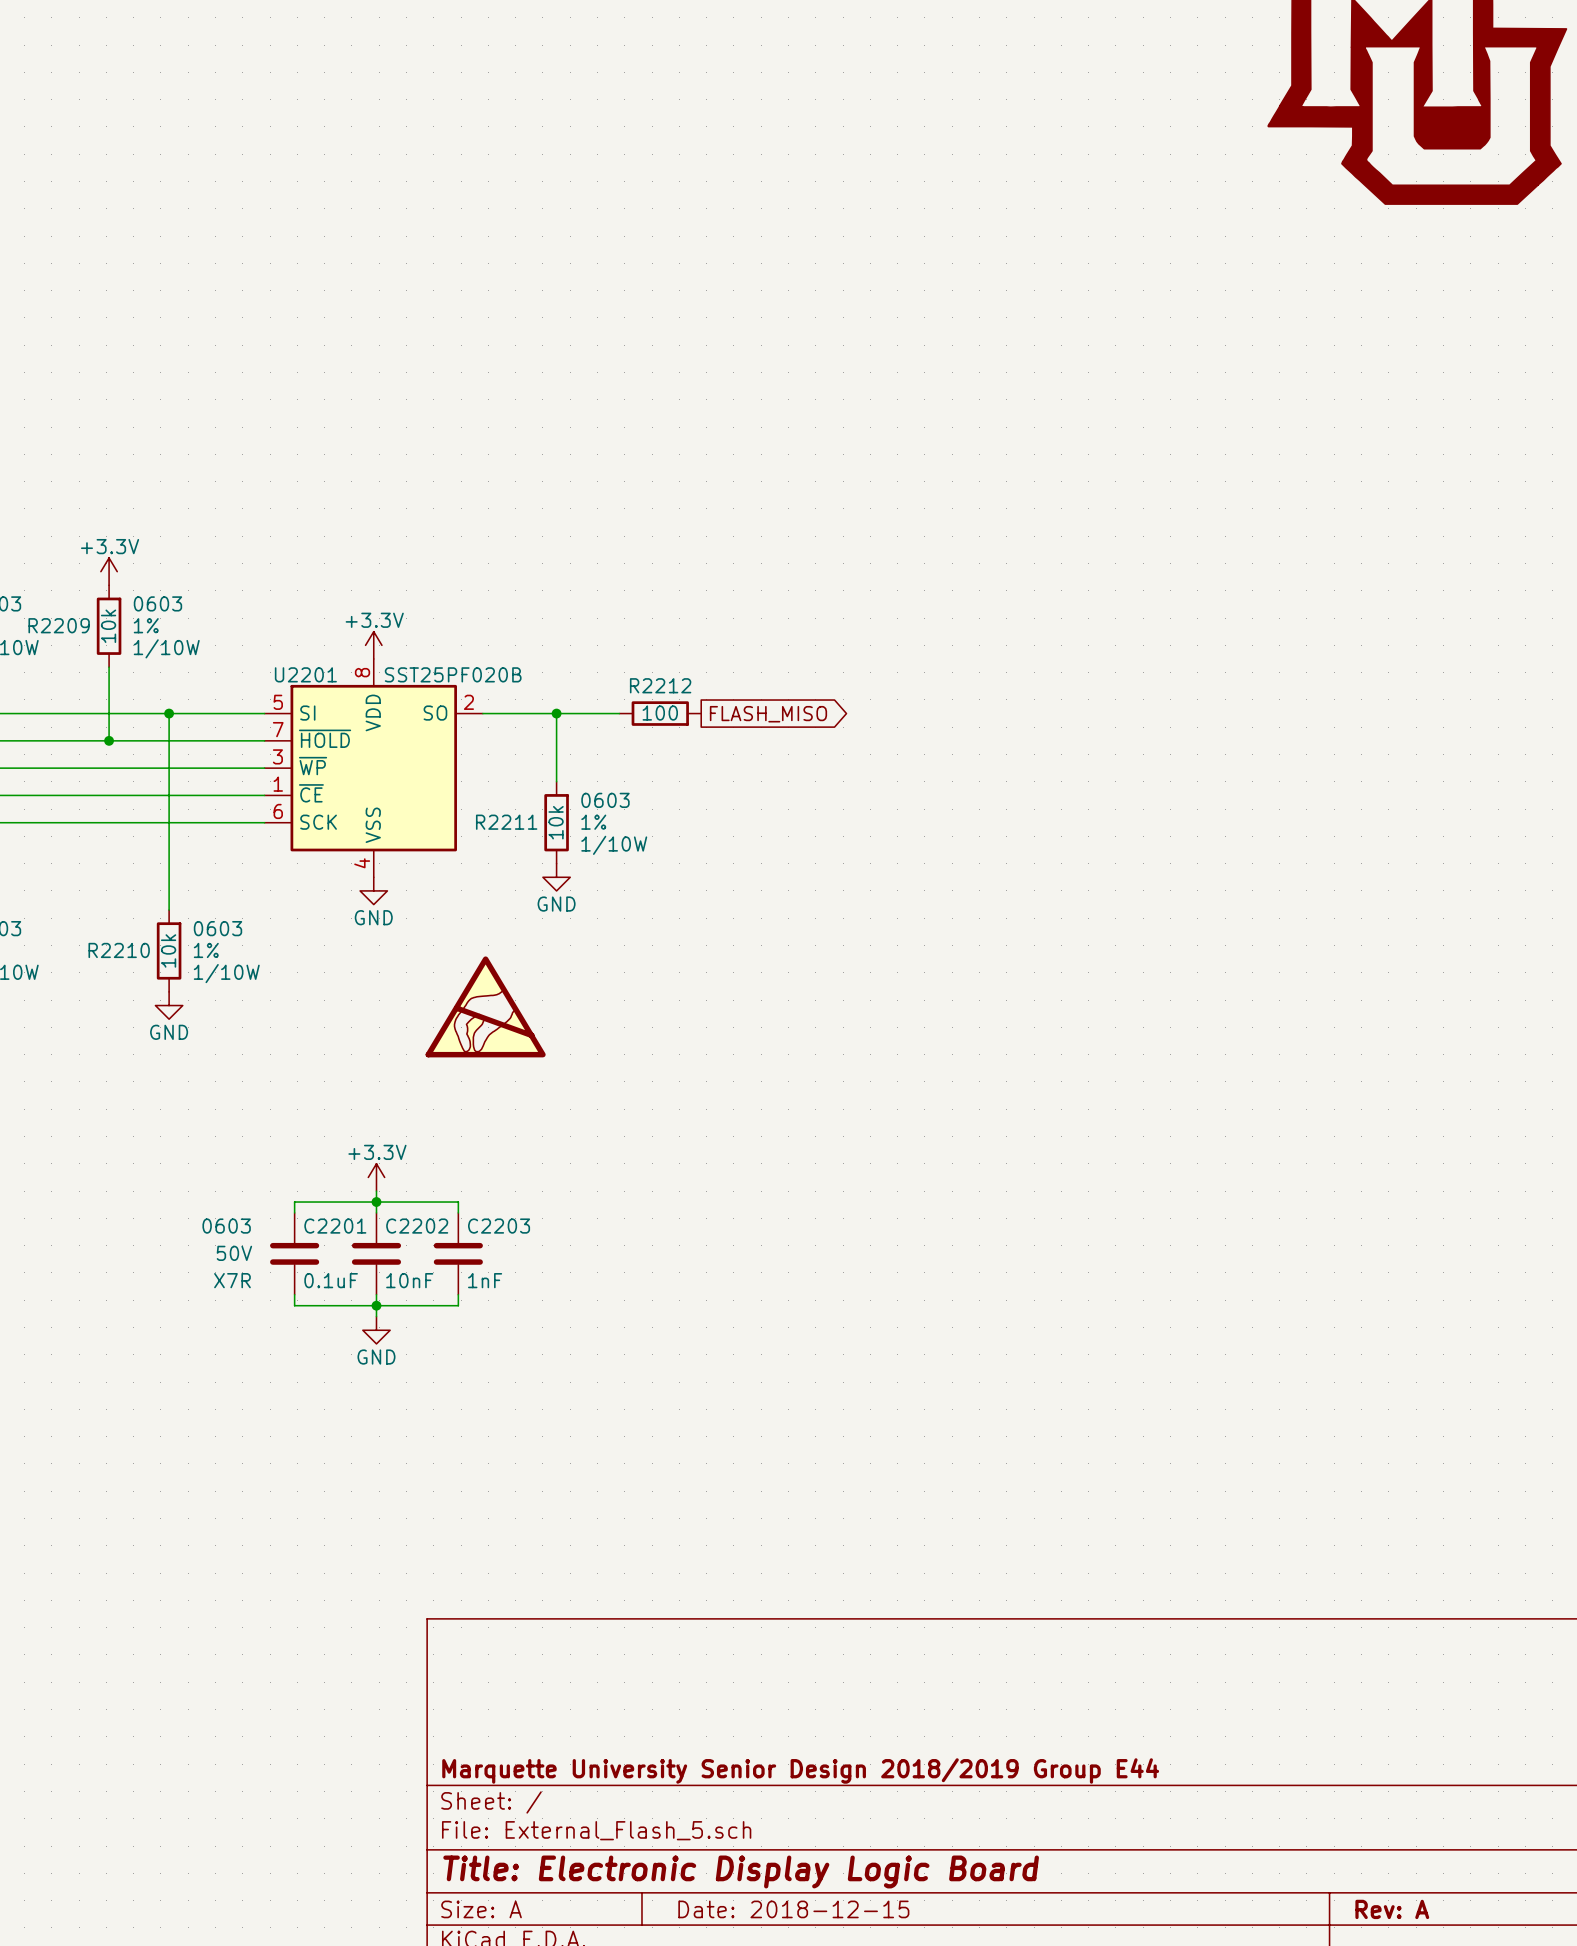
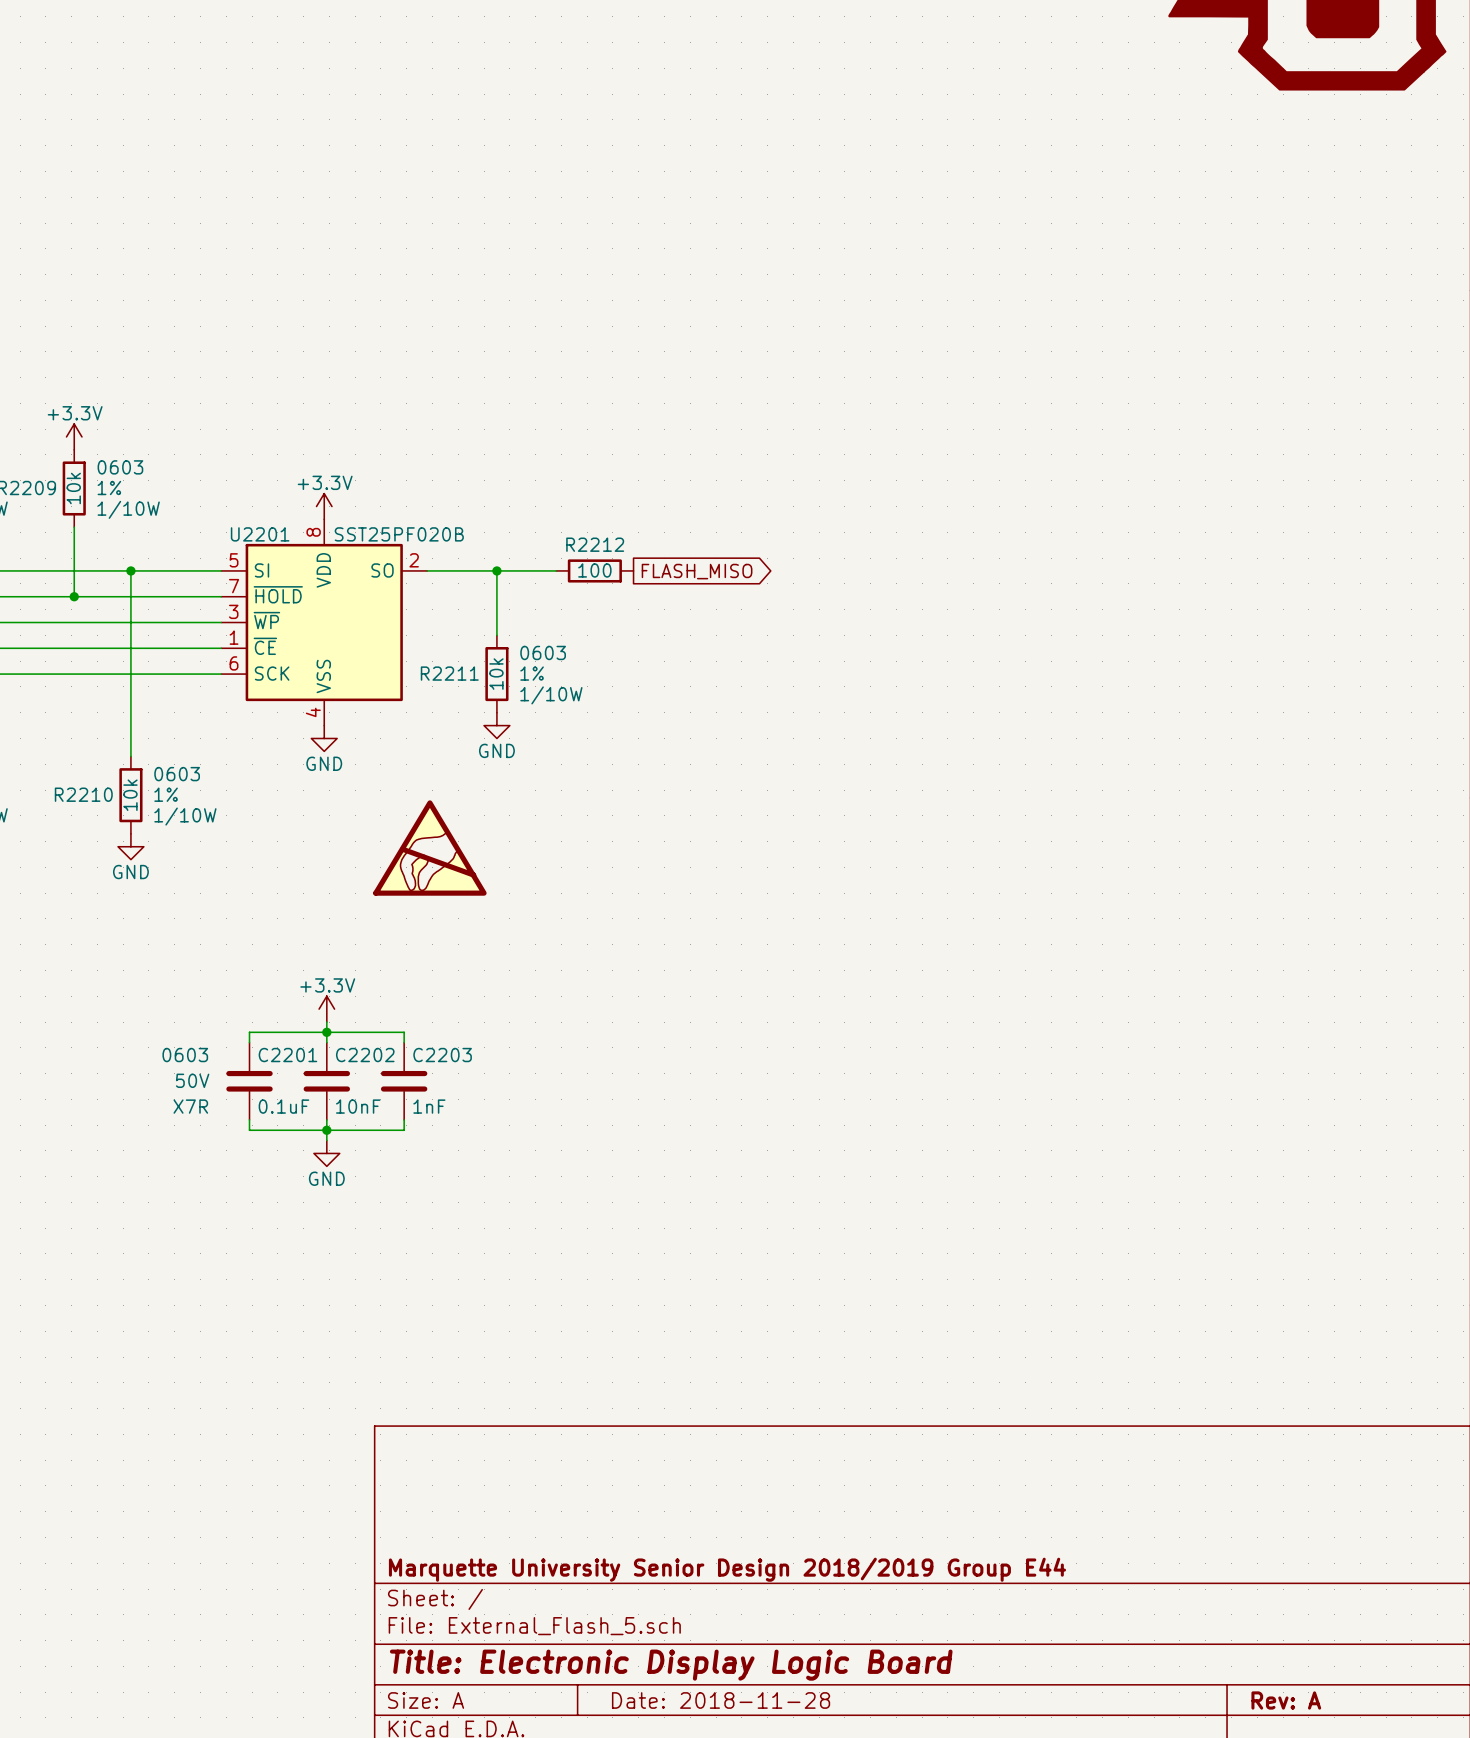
title block: Date: 2018-12-15 (793, 1909) -> Date: 2018-11-28 (721, 1700)

